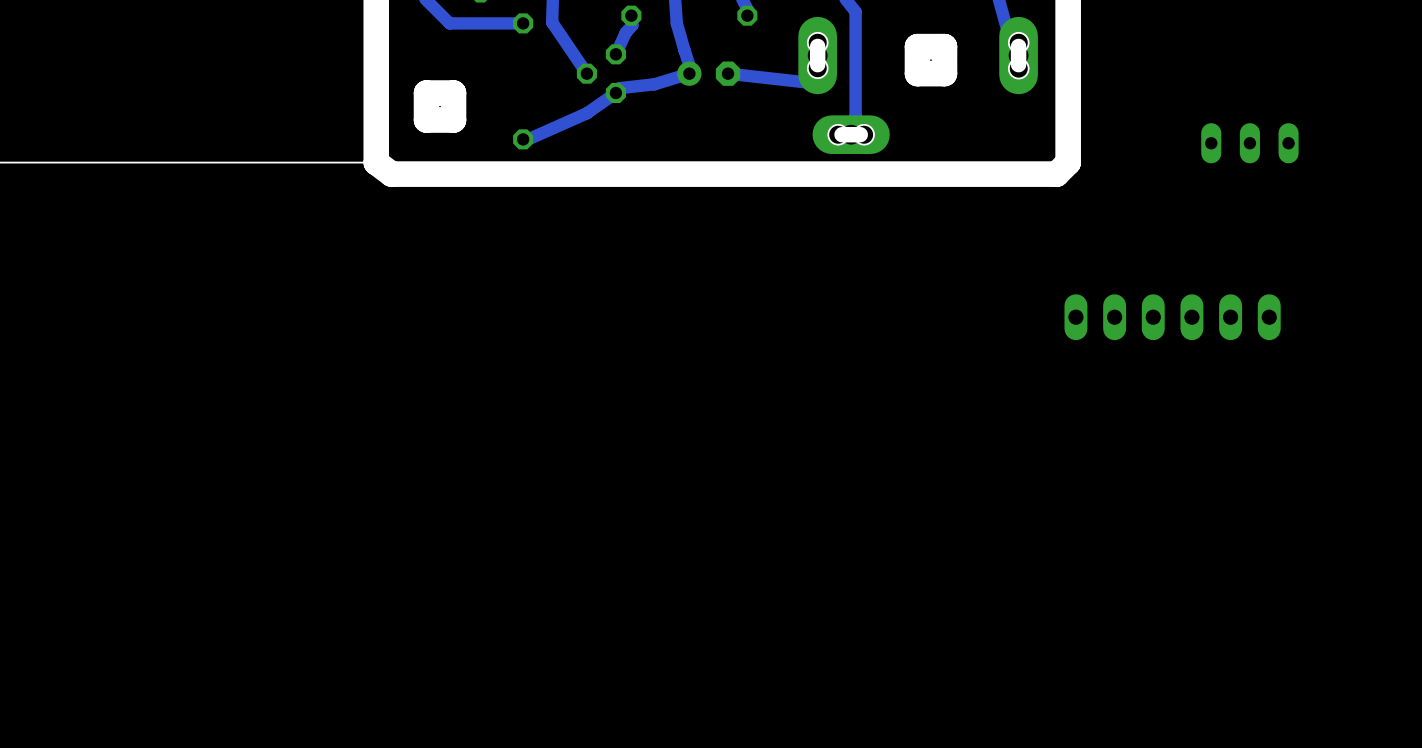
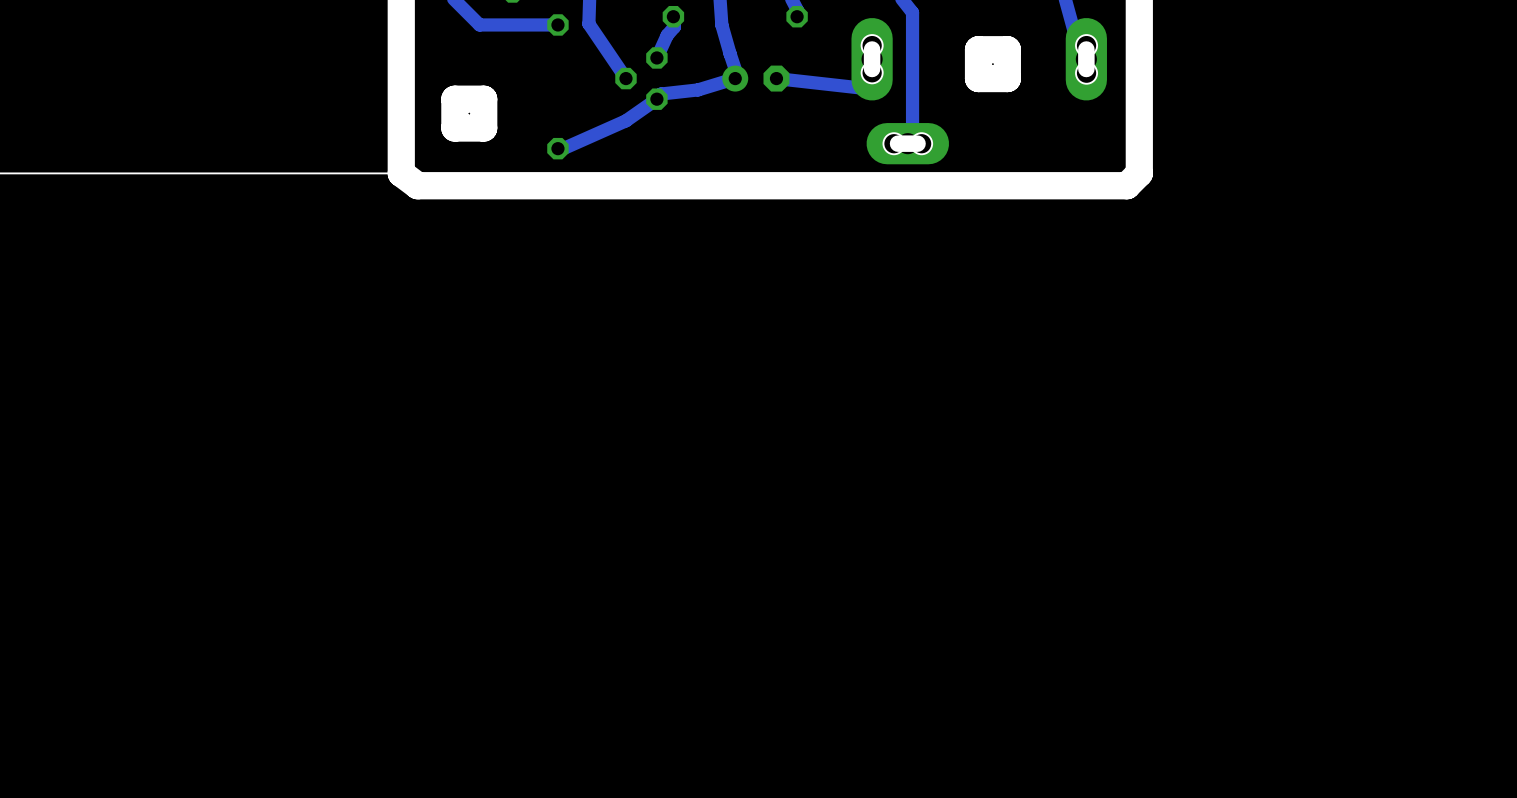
part: (1249, 143) -> none
part: (1172, 317) -> none

